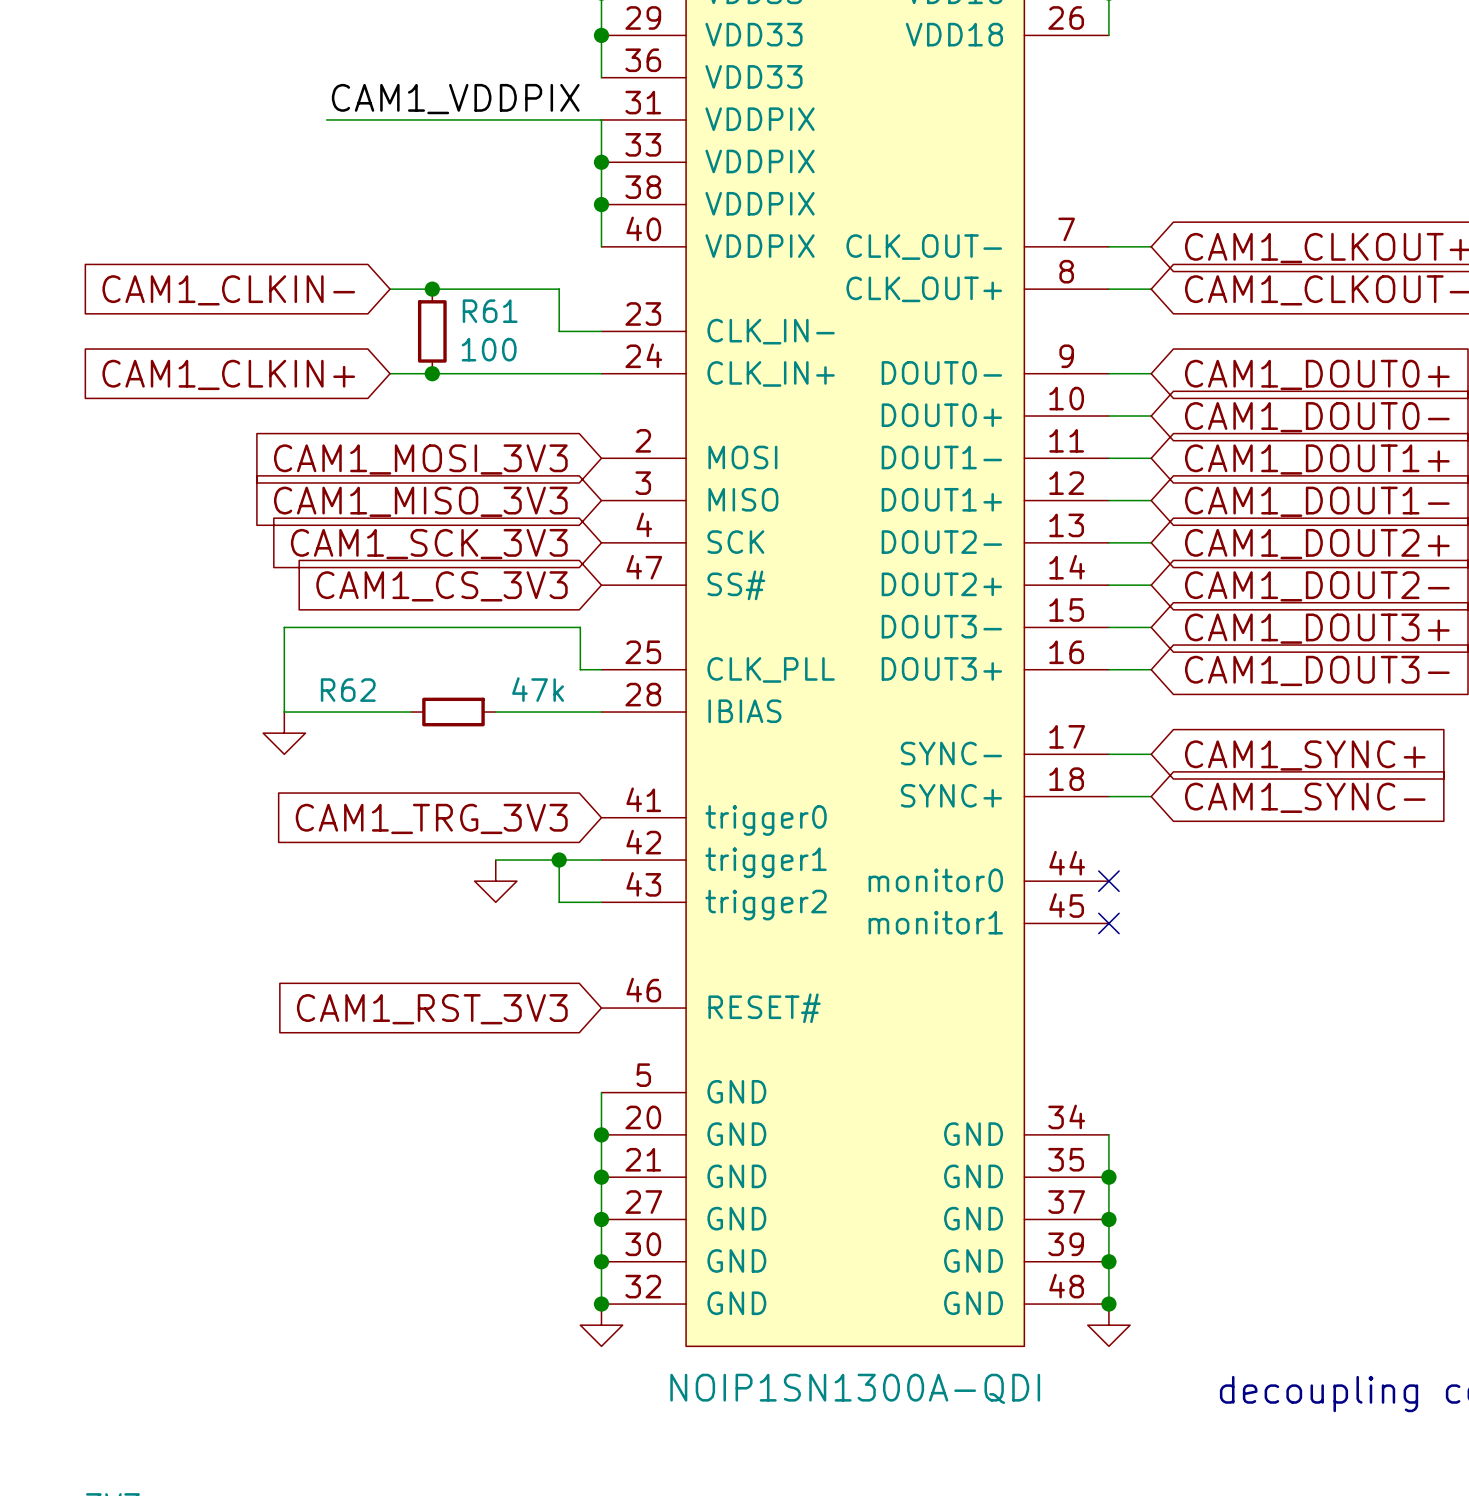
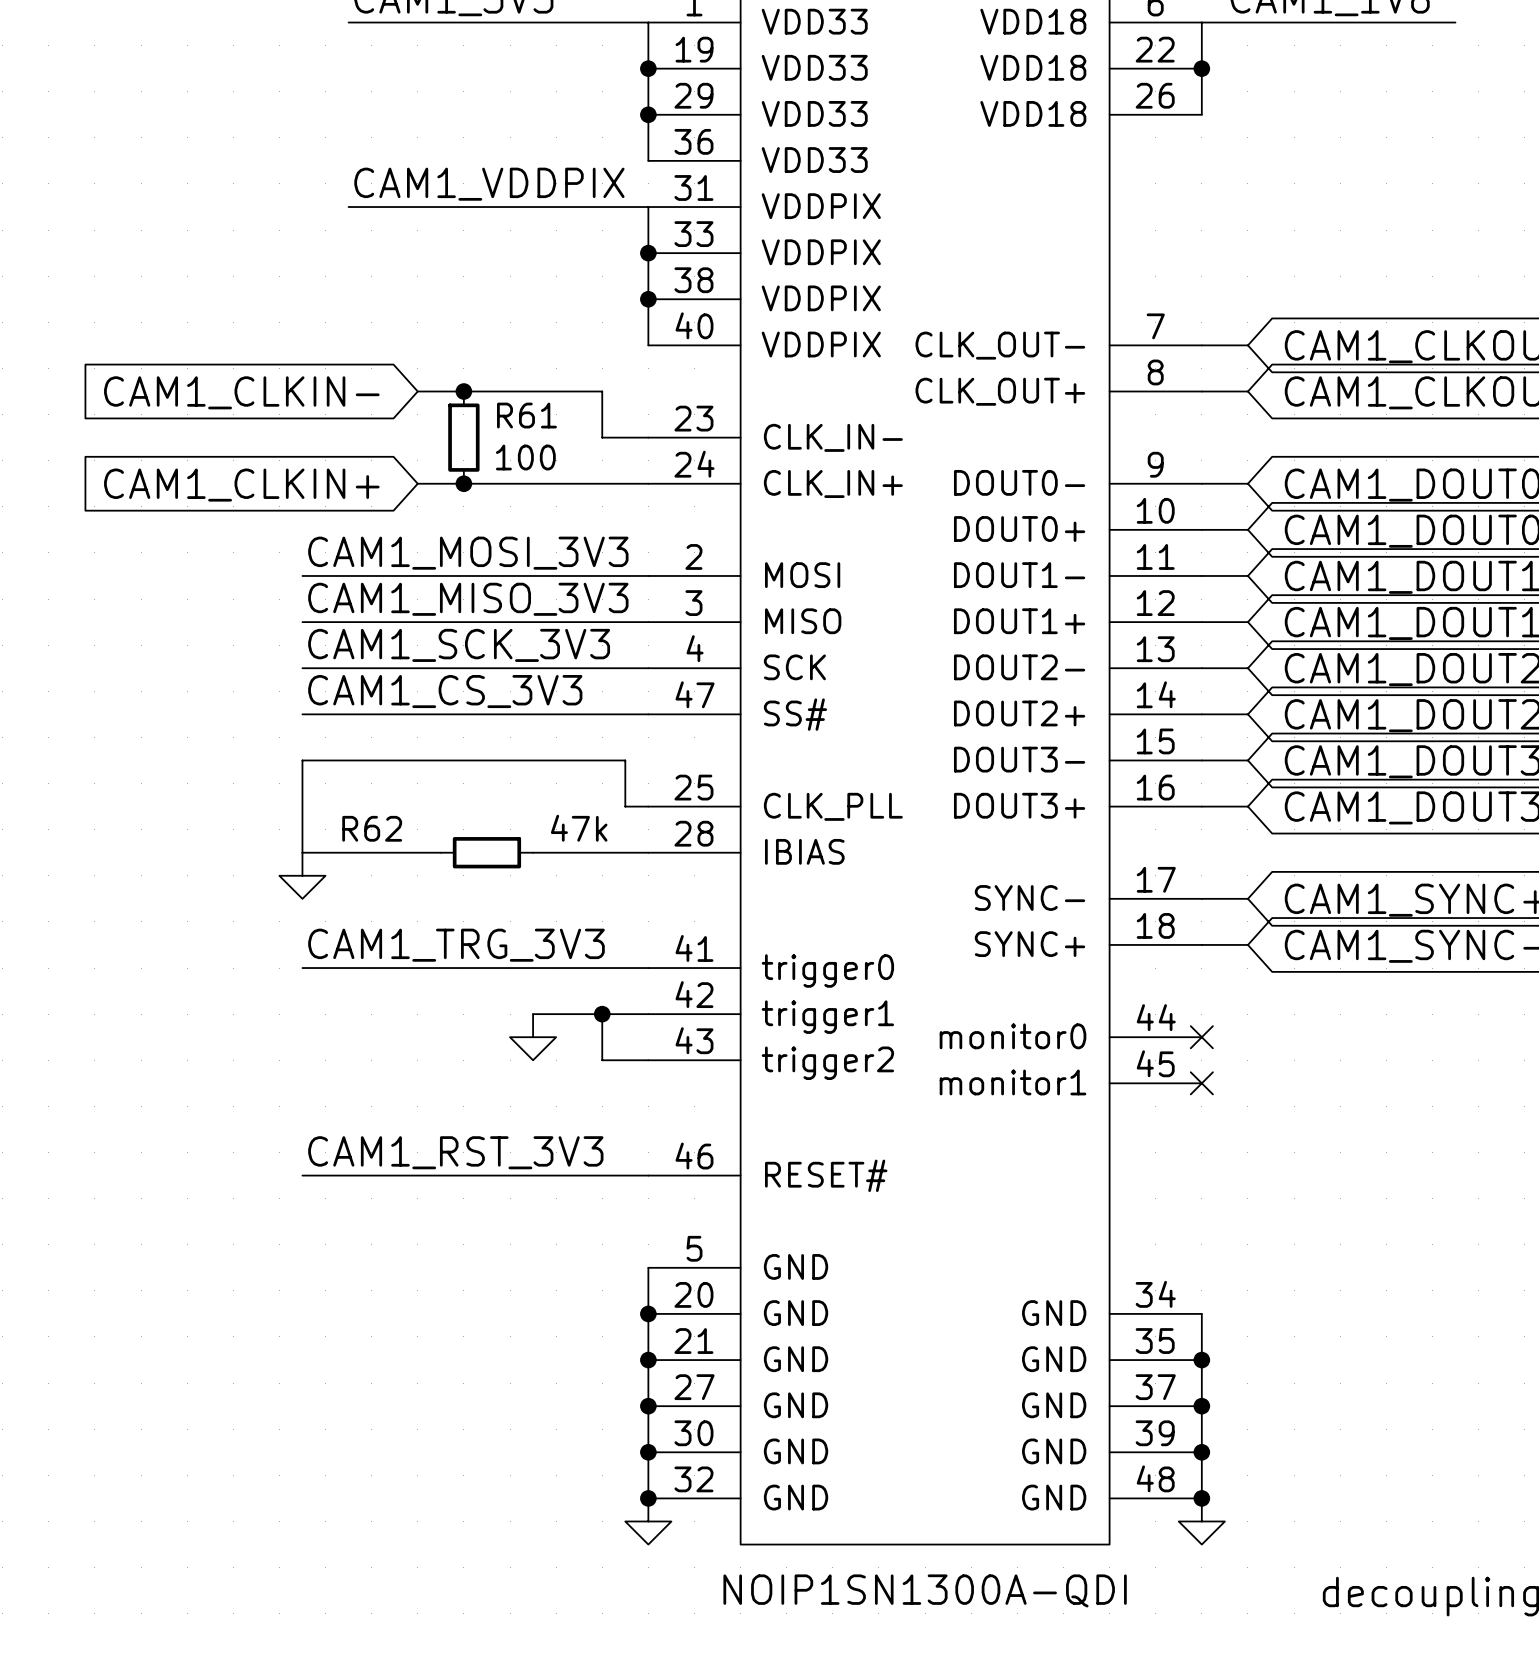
label: none -> CAM1_MOSI_3V3 (468, 553)
wire: none -> (302, 575) (648, 575)
global label: CAM1_MOSI_3V3 (420, 459) -> none
label: none -> CAM1_MISO_3V3 (468, 599)
wire: none -> (302, 622) (648, 622)
global label: CAM1_MISO_3V3 (420, 501) -> none
label: none -> CAM1_SCK_3V3 (459, 645)
wire: none -> (302, 668) (648, 668)
global label: CAM1_SCK_3V3 (429, 544) -> none
label: none -> CAM1_CS_3V3 (445, 691)
wire: none -> (302, 714) (648, 714)
global label: CAM1_CS_3V3 (441, 586) -> none
label: none -> CAM1_TRG_3V3 (456, 945)
wire: none -> (302, 968) (648, 968)
global label: CAM1_TRG_3V3 (431, 818) -> none
label: none -> CAM1_RST_3V3 (455, 1152)
wire: none -> (302, 1175) (648, 1175)
global label: CAM1_RST_3V3 (432, 1009) -> none

